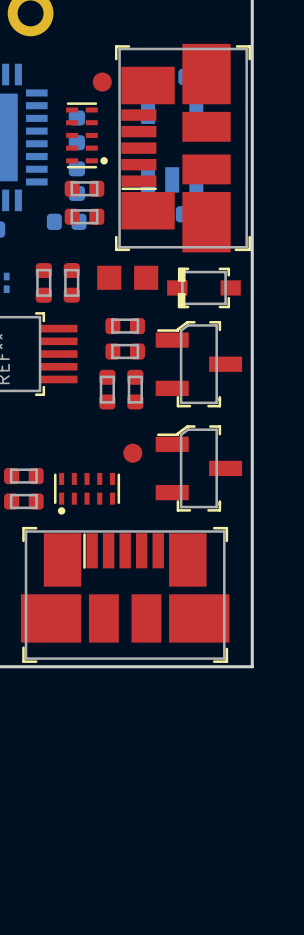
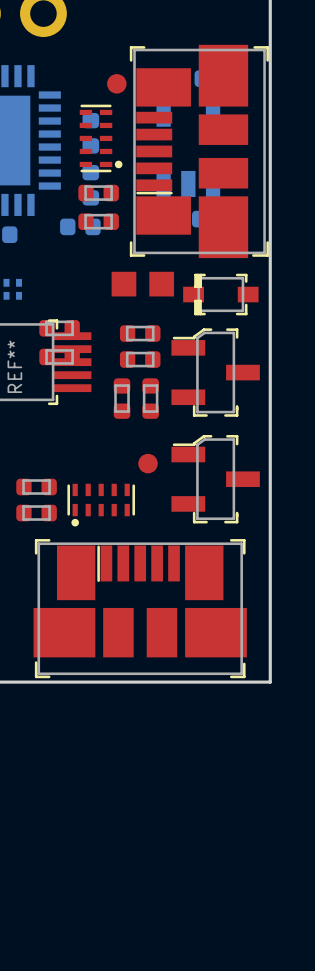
part: (43, 282) -> none
part: (71, 282) -> none
part: none -> (59, 328)
part: none -> (59, 356)

